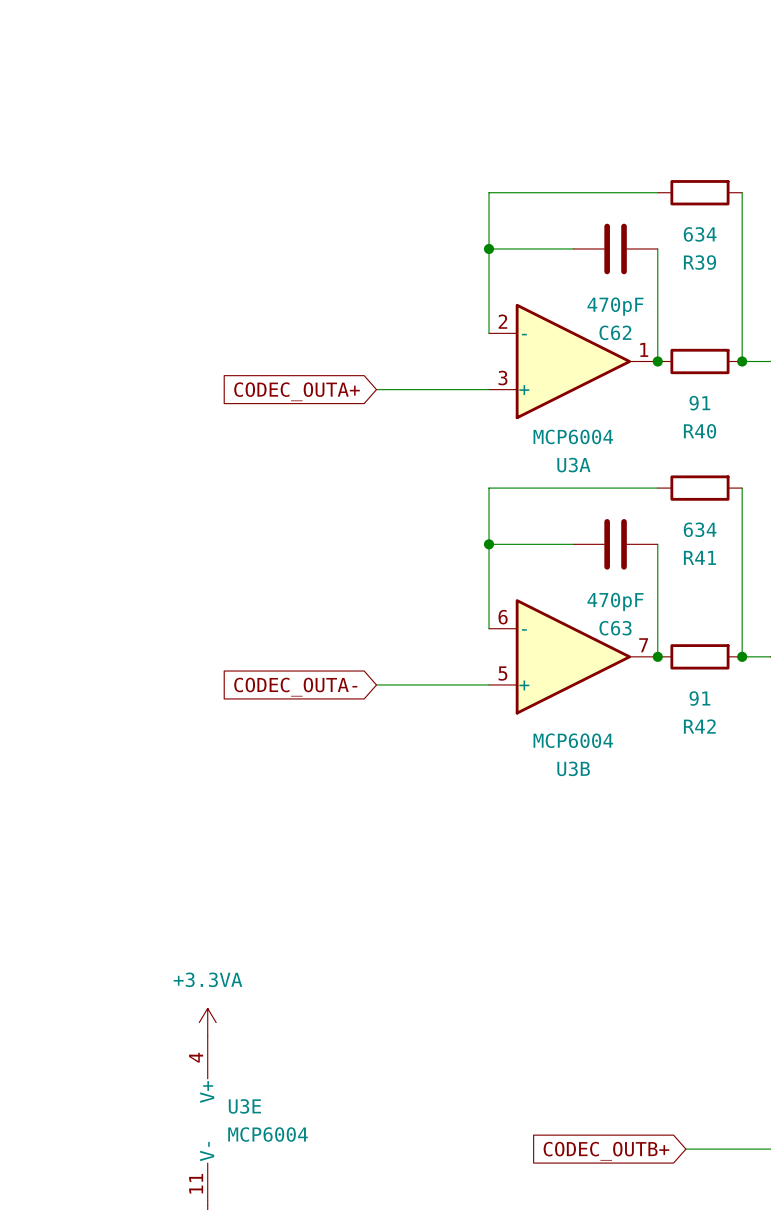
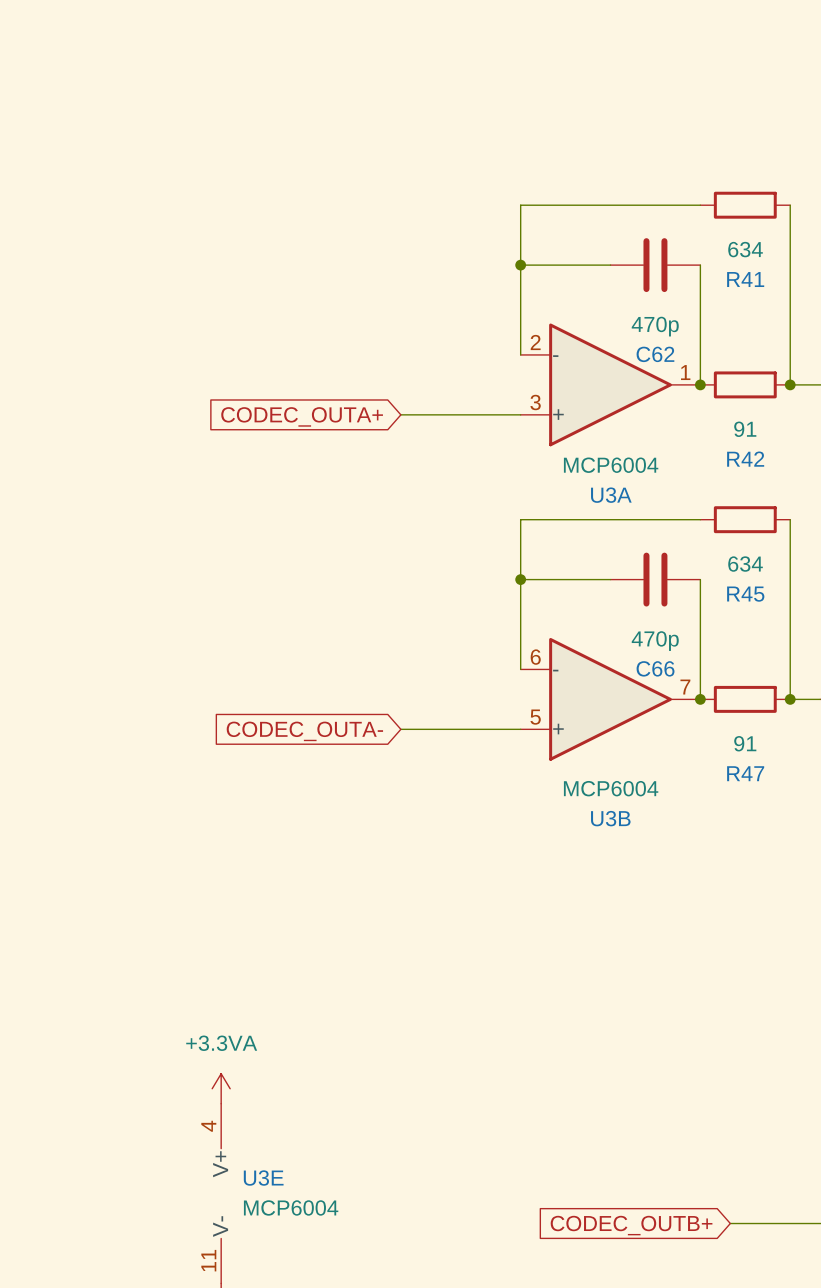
R39 name: R39 (699, 262) -> R41 (745, 279)
C62 value: 470pF (615, 306) -> 470p (655, 326)
R40 name: R40 (700, 431) -> R42 (745, 459)
R41 name: R41 (699, 557) -> R45 (745, 594)
C63 value: 470pF (615, 601) -> 470p (655, 641)
C63 name: C63 (615, 628) -> C66 (655, 668)
R42 name: R42 (699, 726) -> R47 (745, 773)

